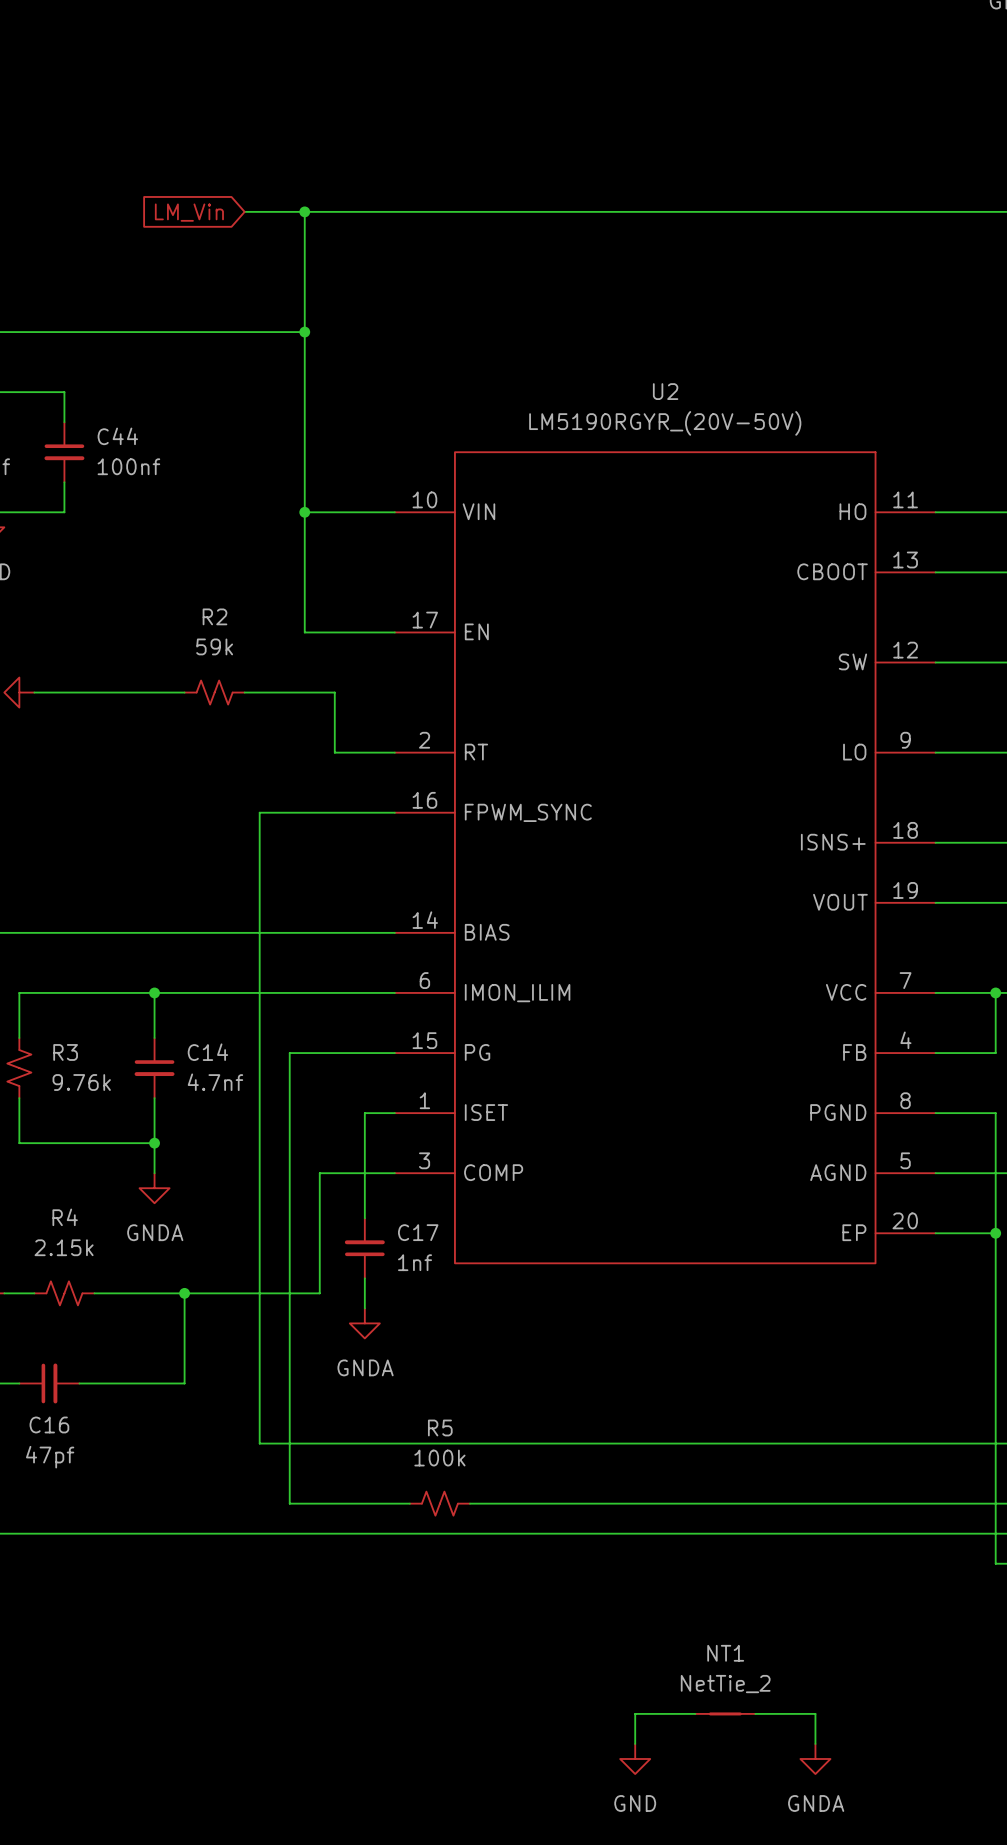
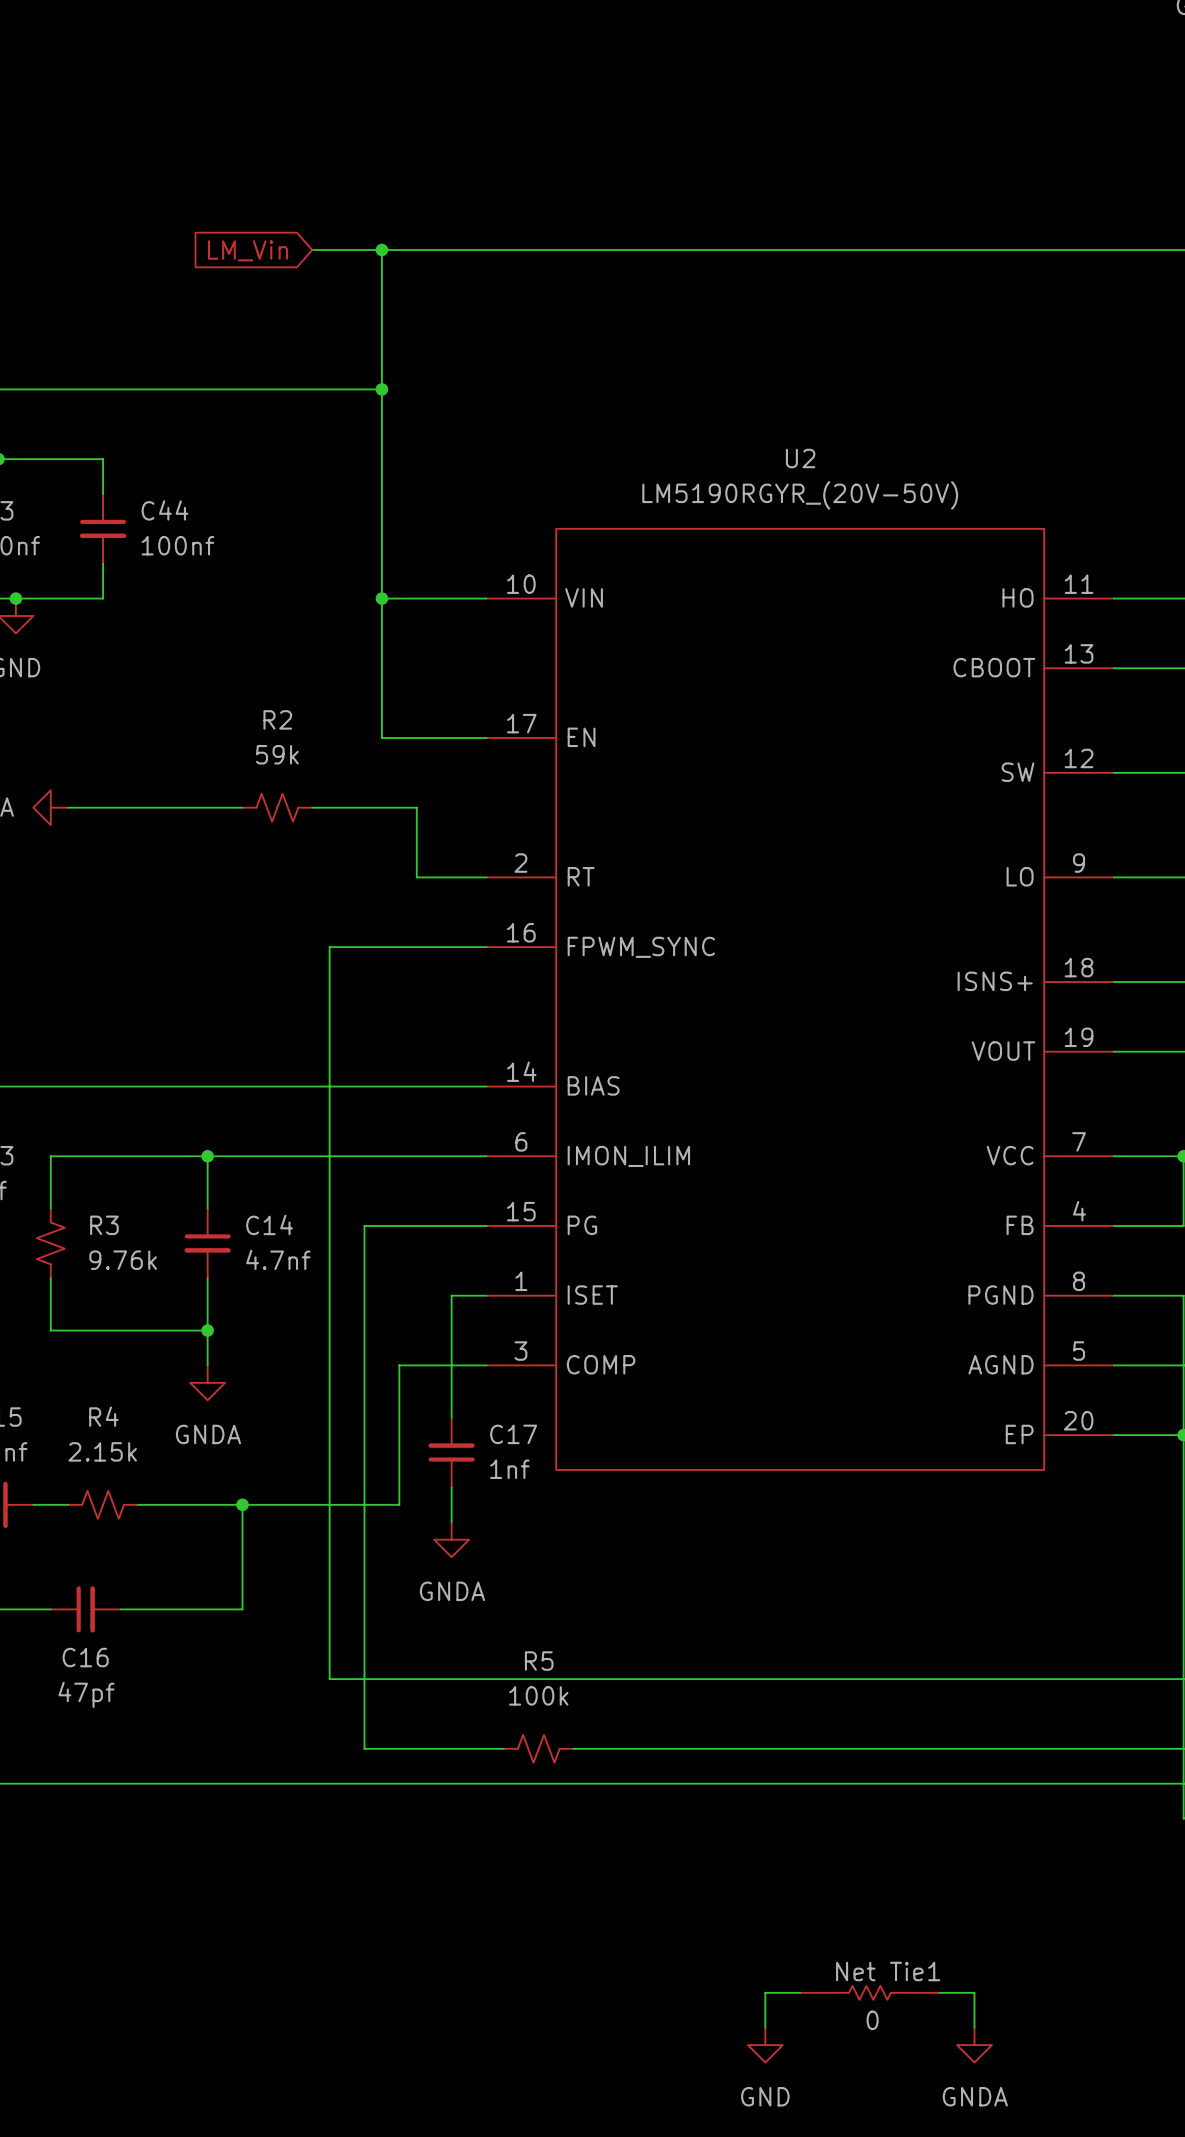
NT1: NetTie_2 (725, 1713) -> none
Net Tie1: none -> 0 (869, 1992)

